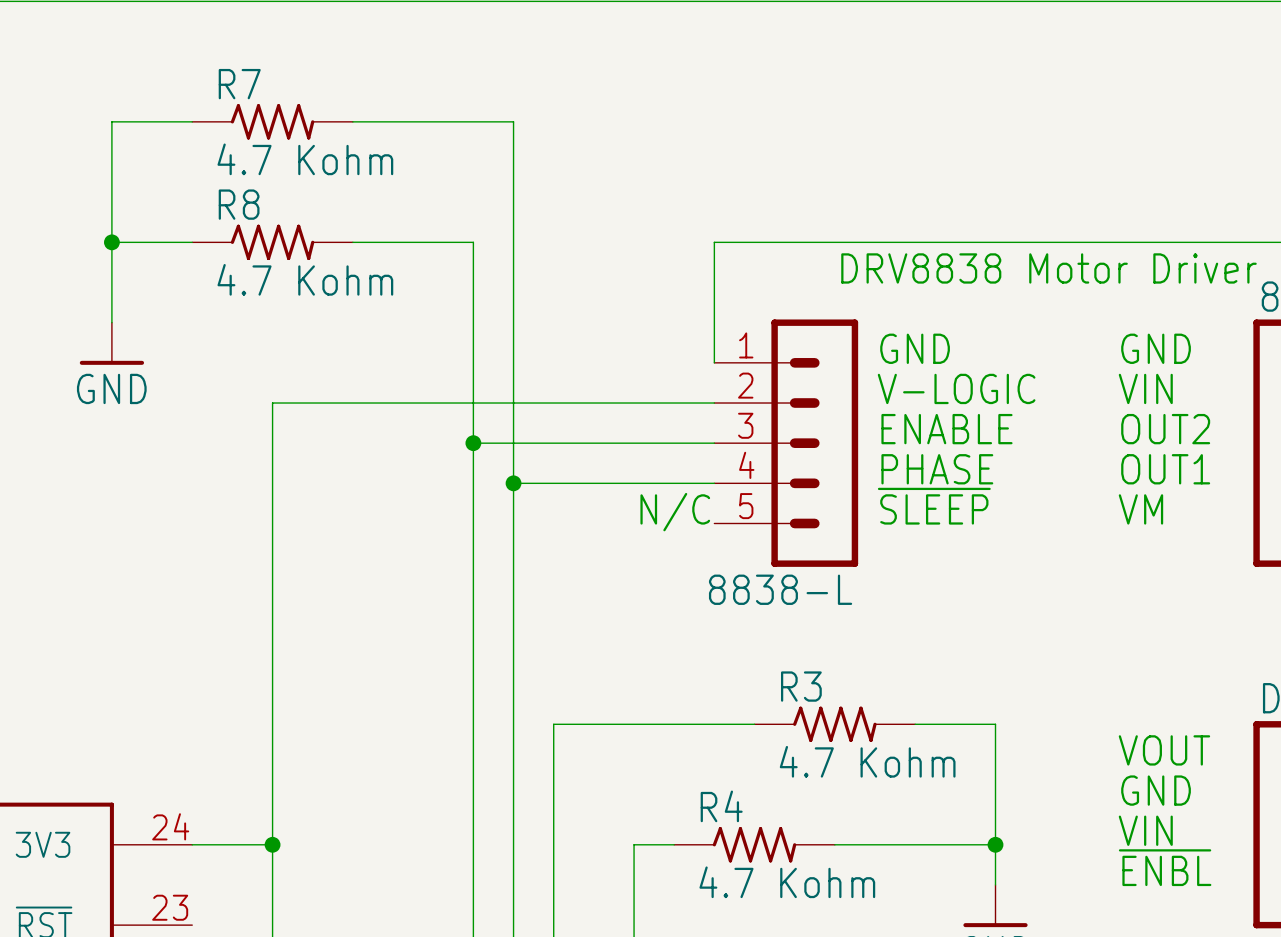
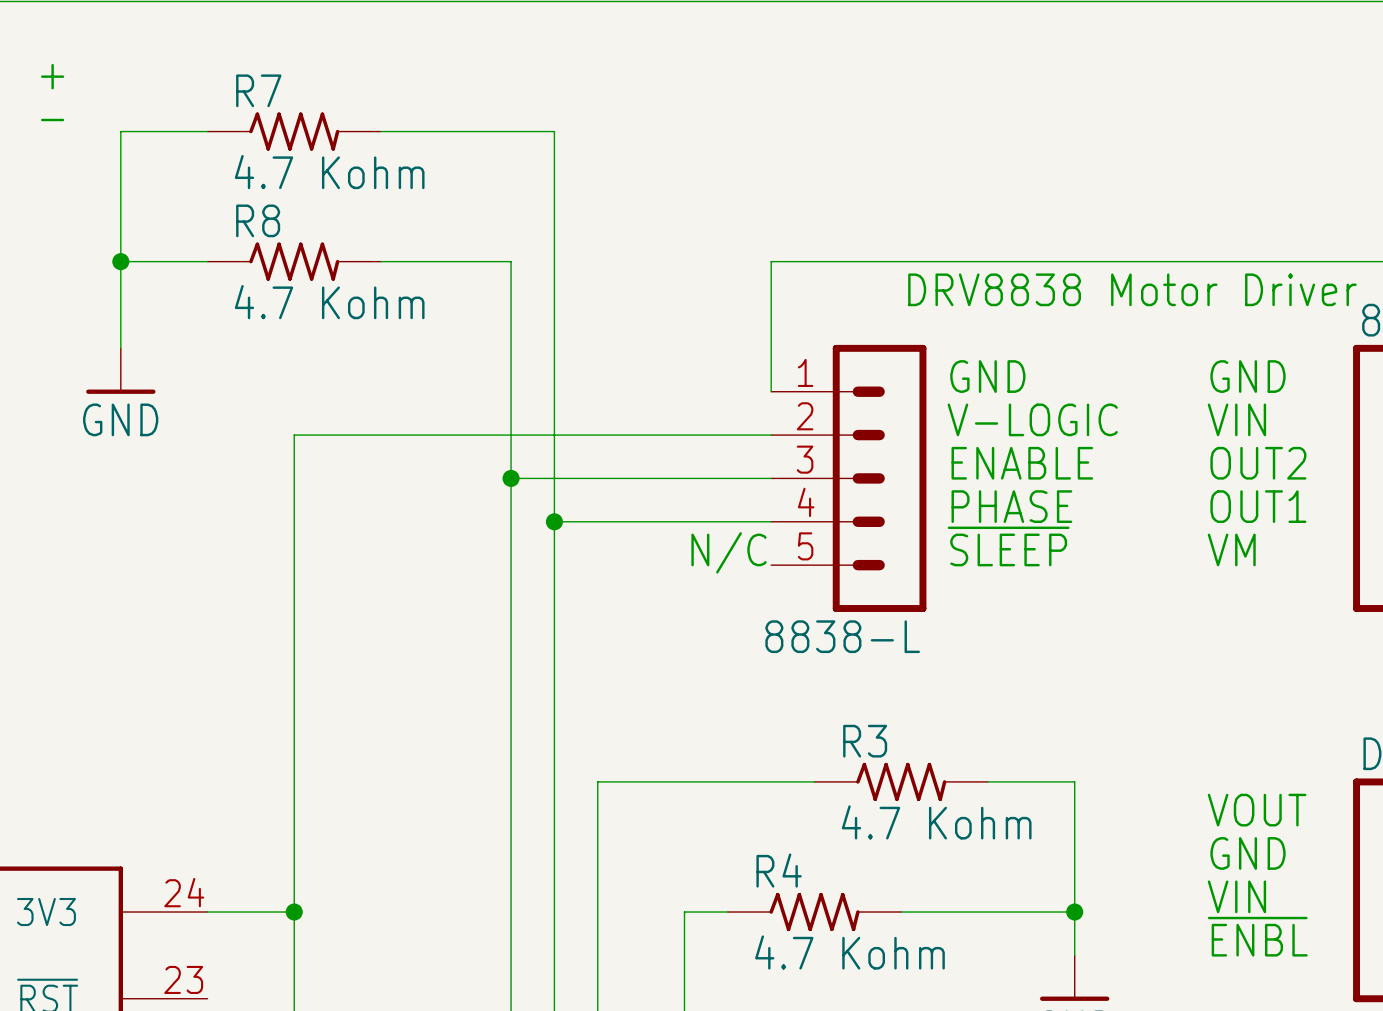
text: none -> + (52, 76)
text: none -> - (52, 120)

